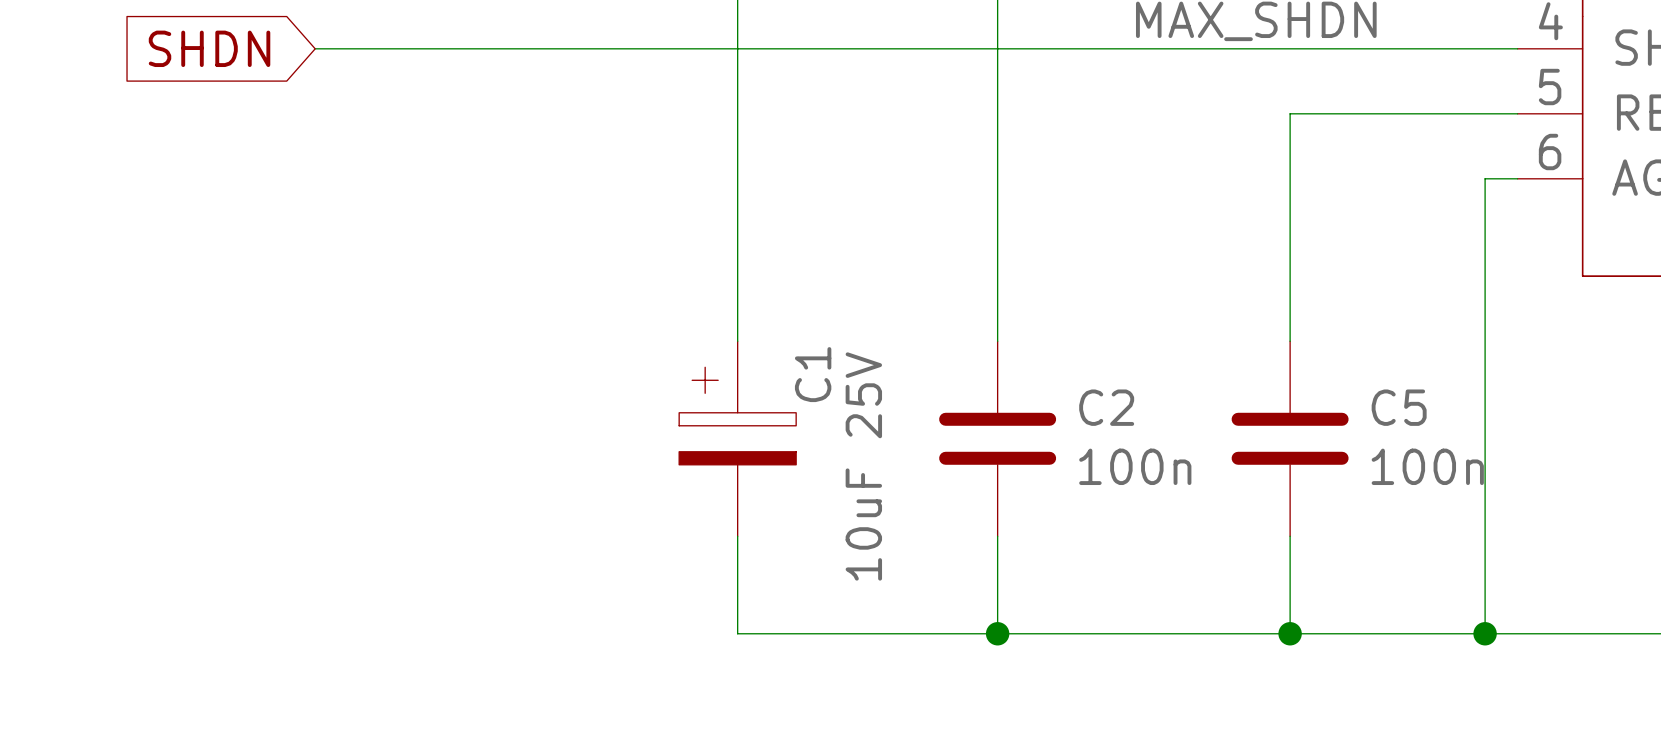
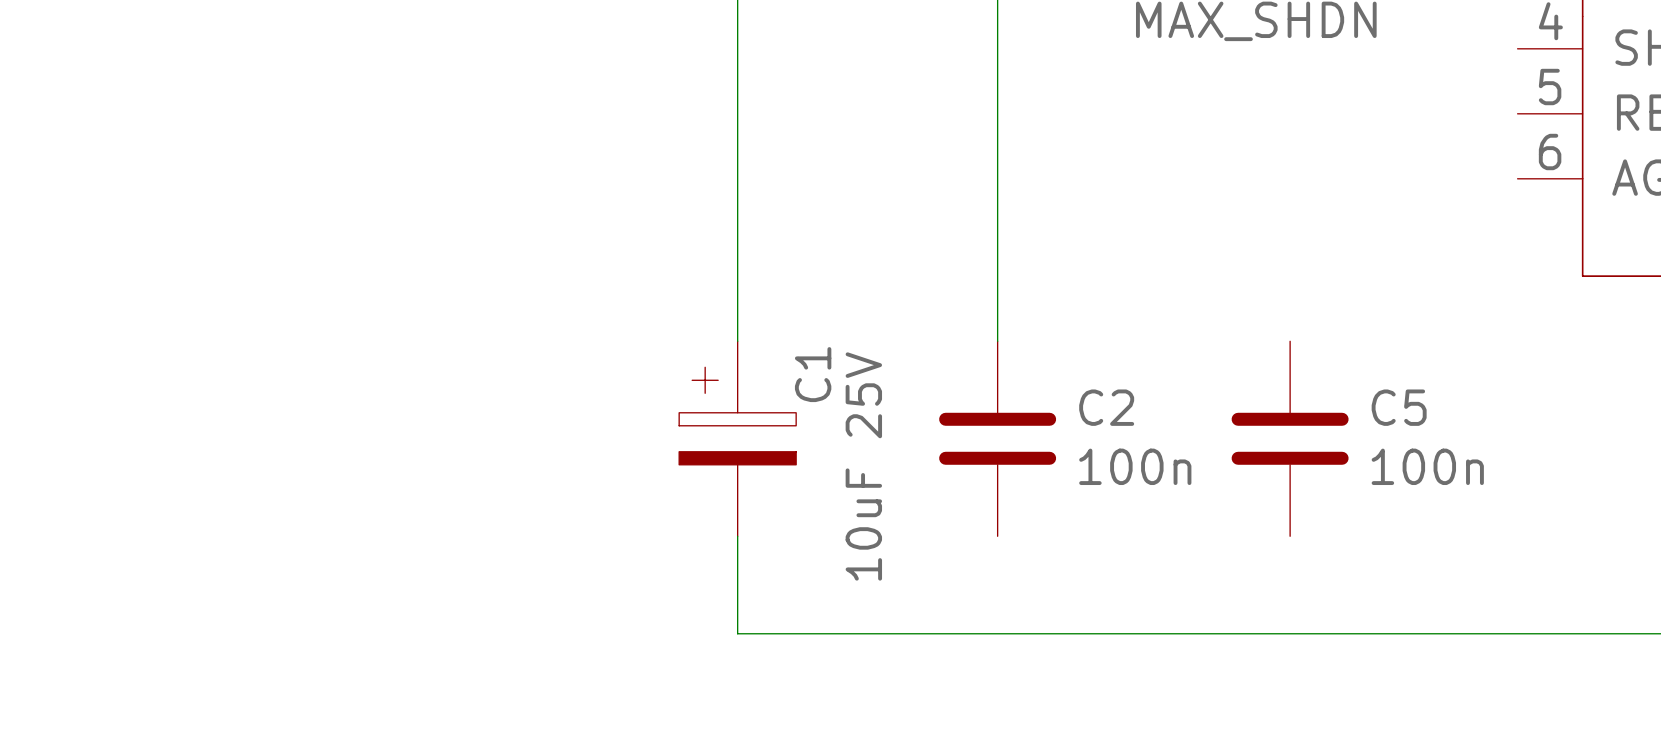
global label: SHDN (209, 48) -> none
wire: (315, 48) (1517, 48) -> none
wire: (1517, 113) (1290, 113) (1290, 341) -> none
wire: (1517, 178) (1485, 178) (1485, 633) -> none
wire: (997, 536) (997, 633) -> none
wire: (1290, 536) (1290, 633) -> none
junction: (997, 633) -> none
junction: (1290, 633) -> none
junction: (1485, 633) -> none

